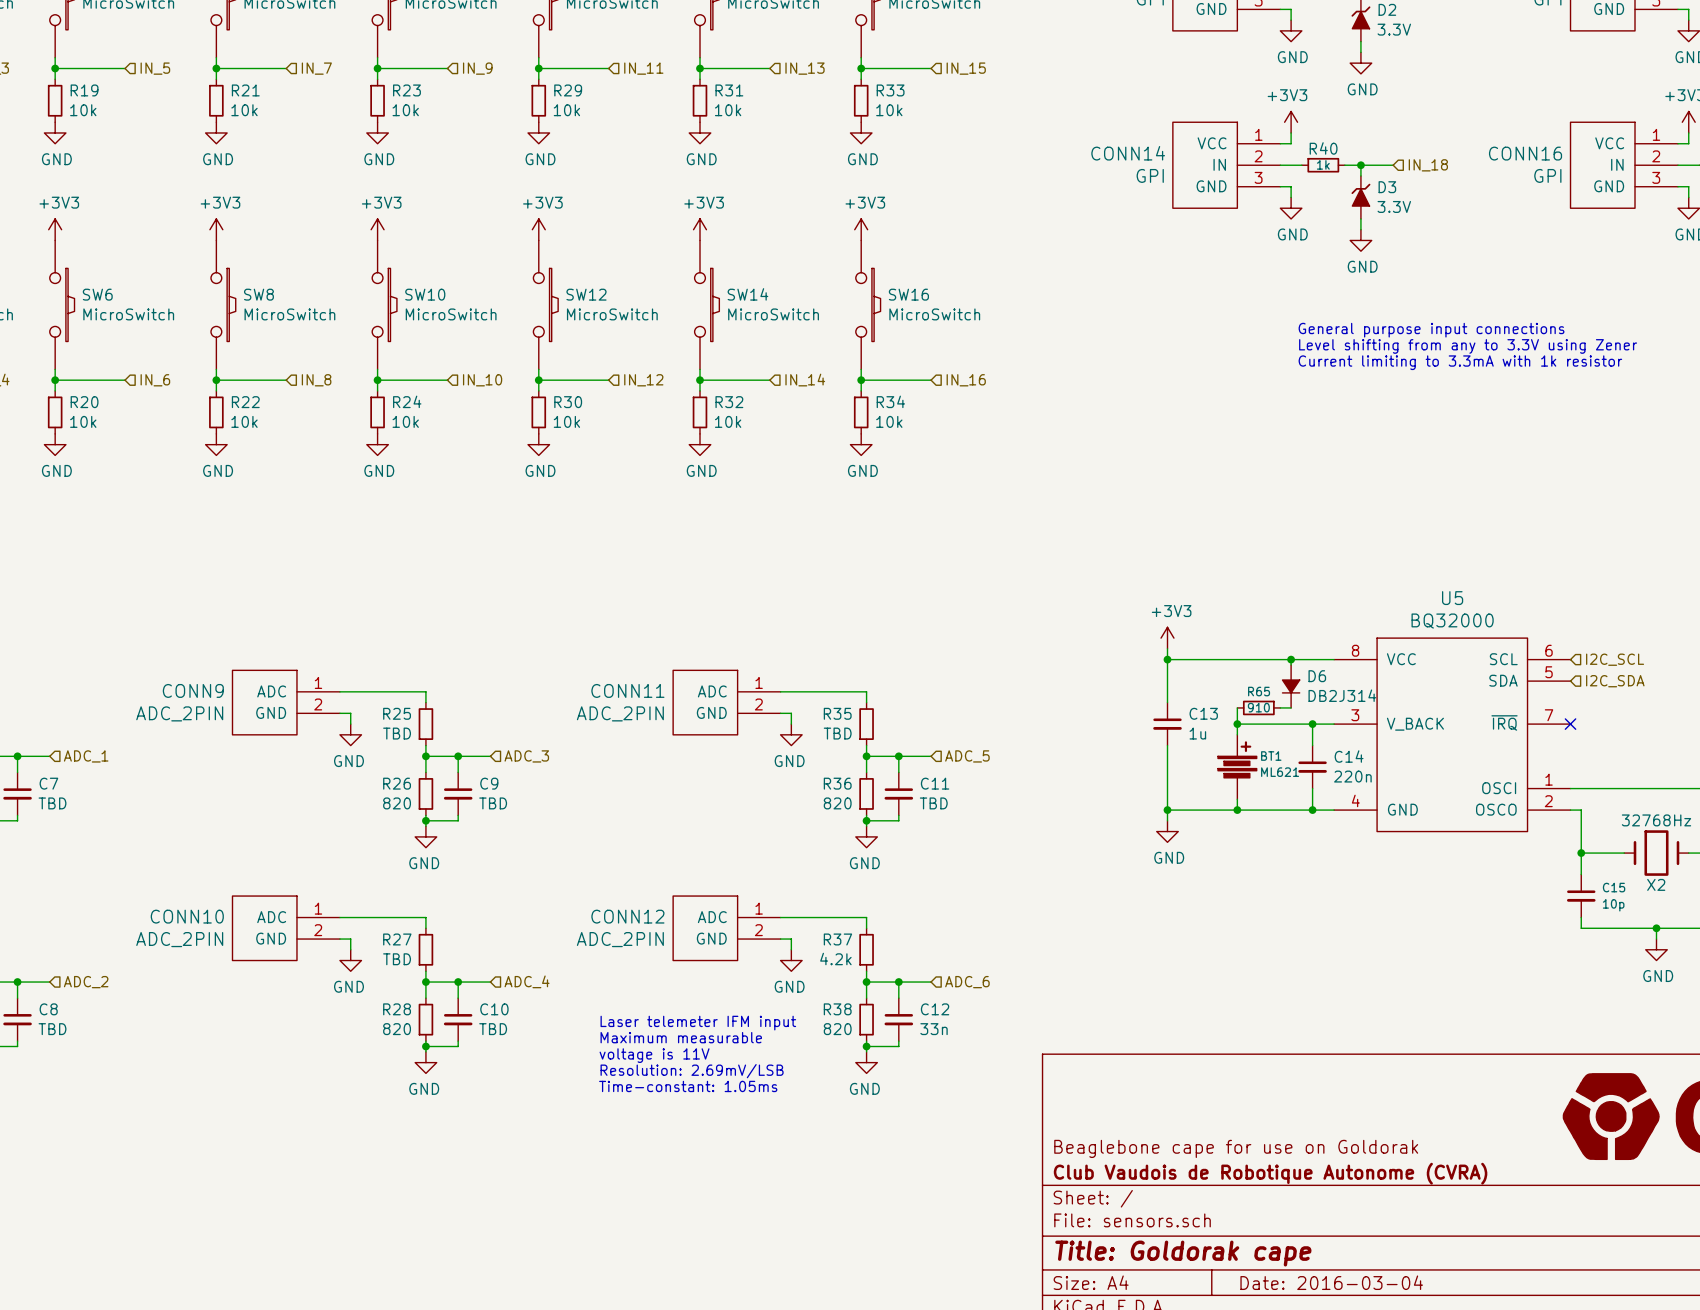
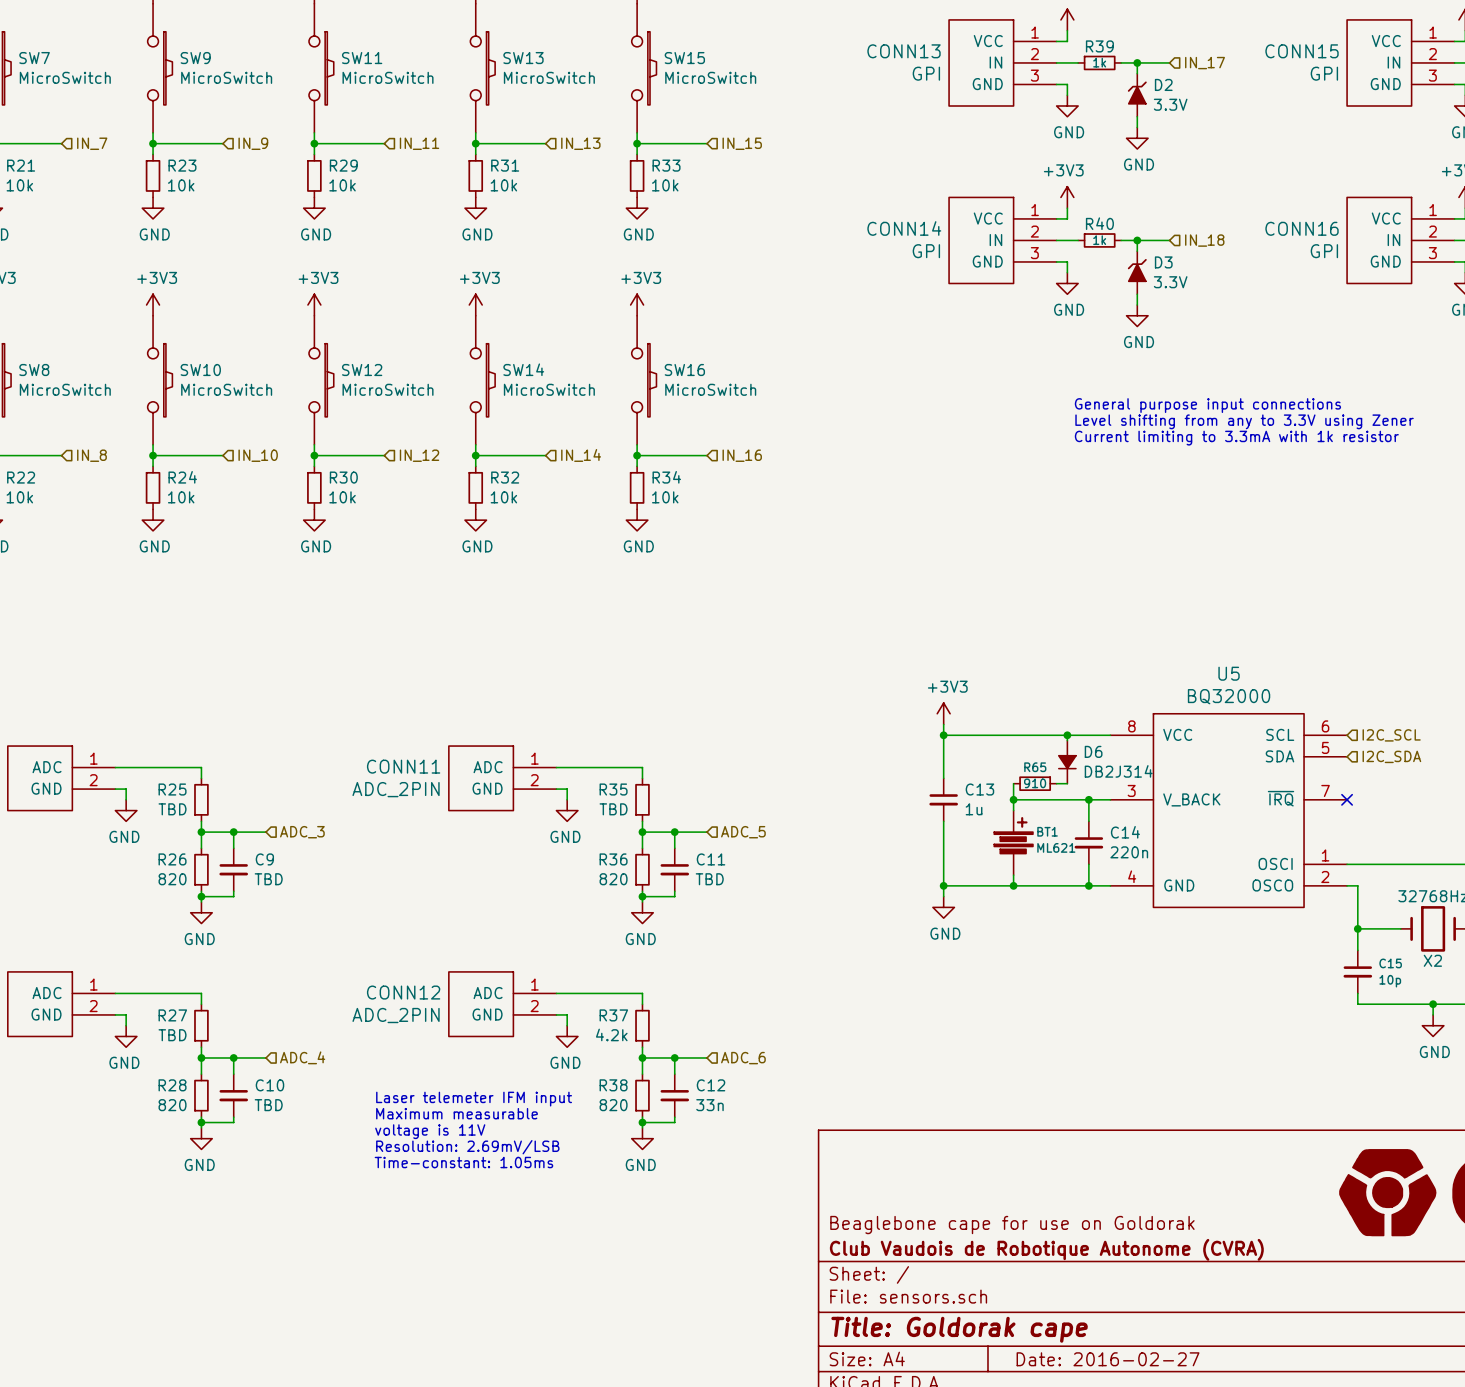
title block: Date: 2016-03-04 (1331, 1282) -> Date: 2016-02-27 (1108, 1359)

